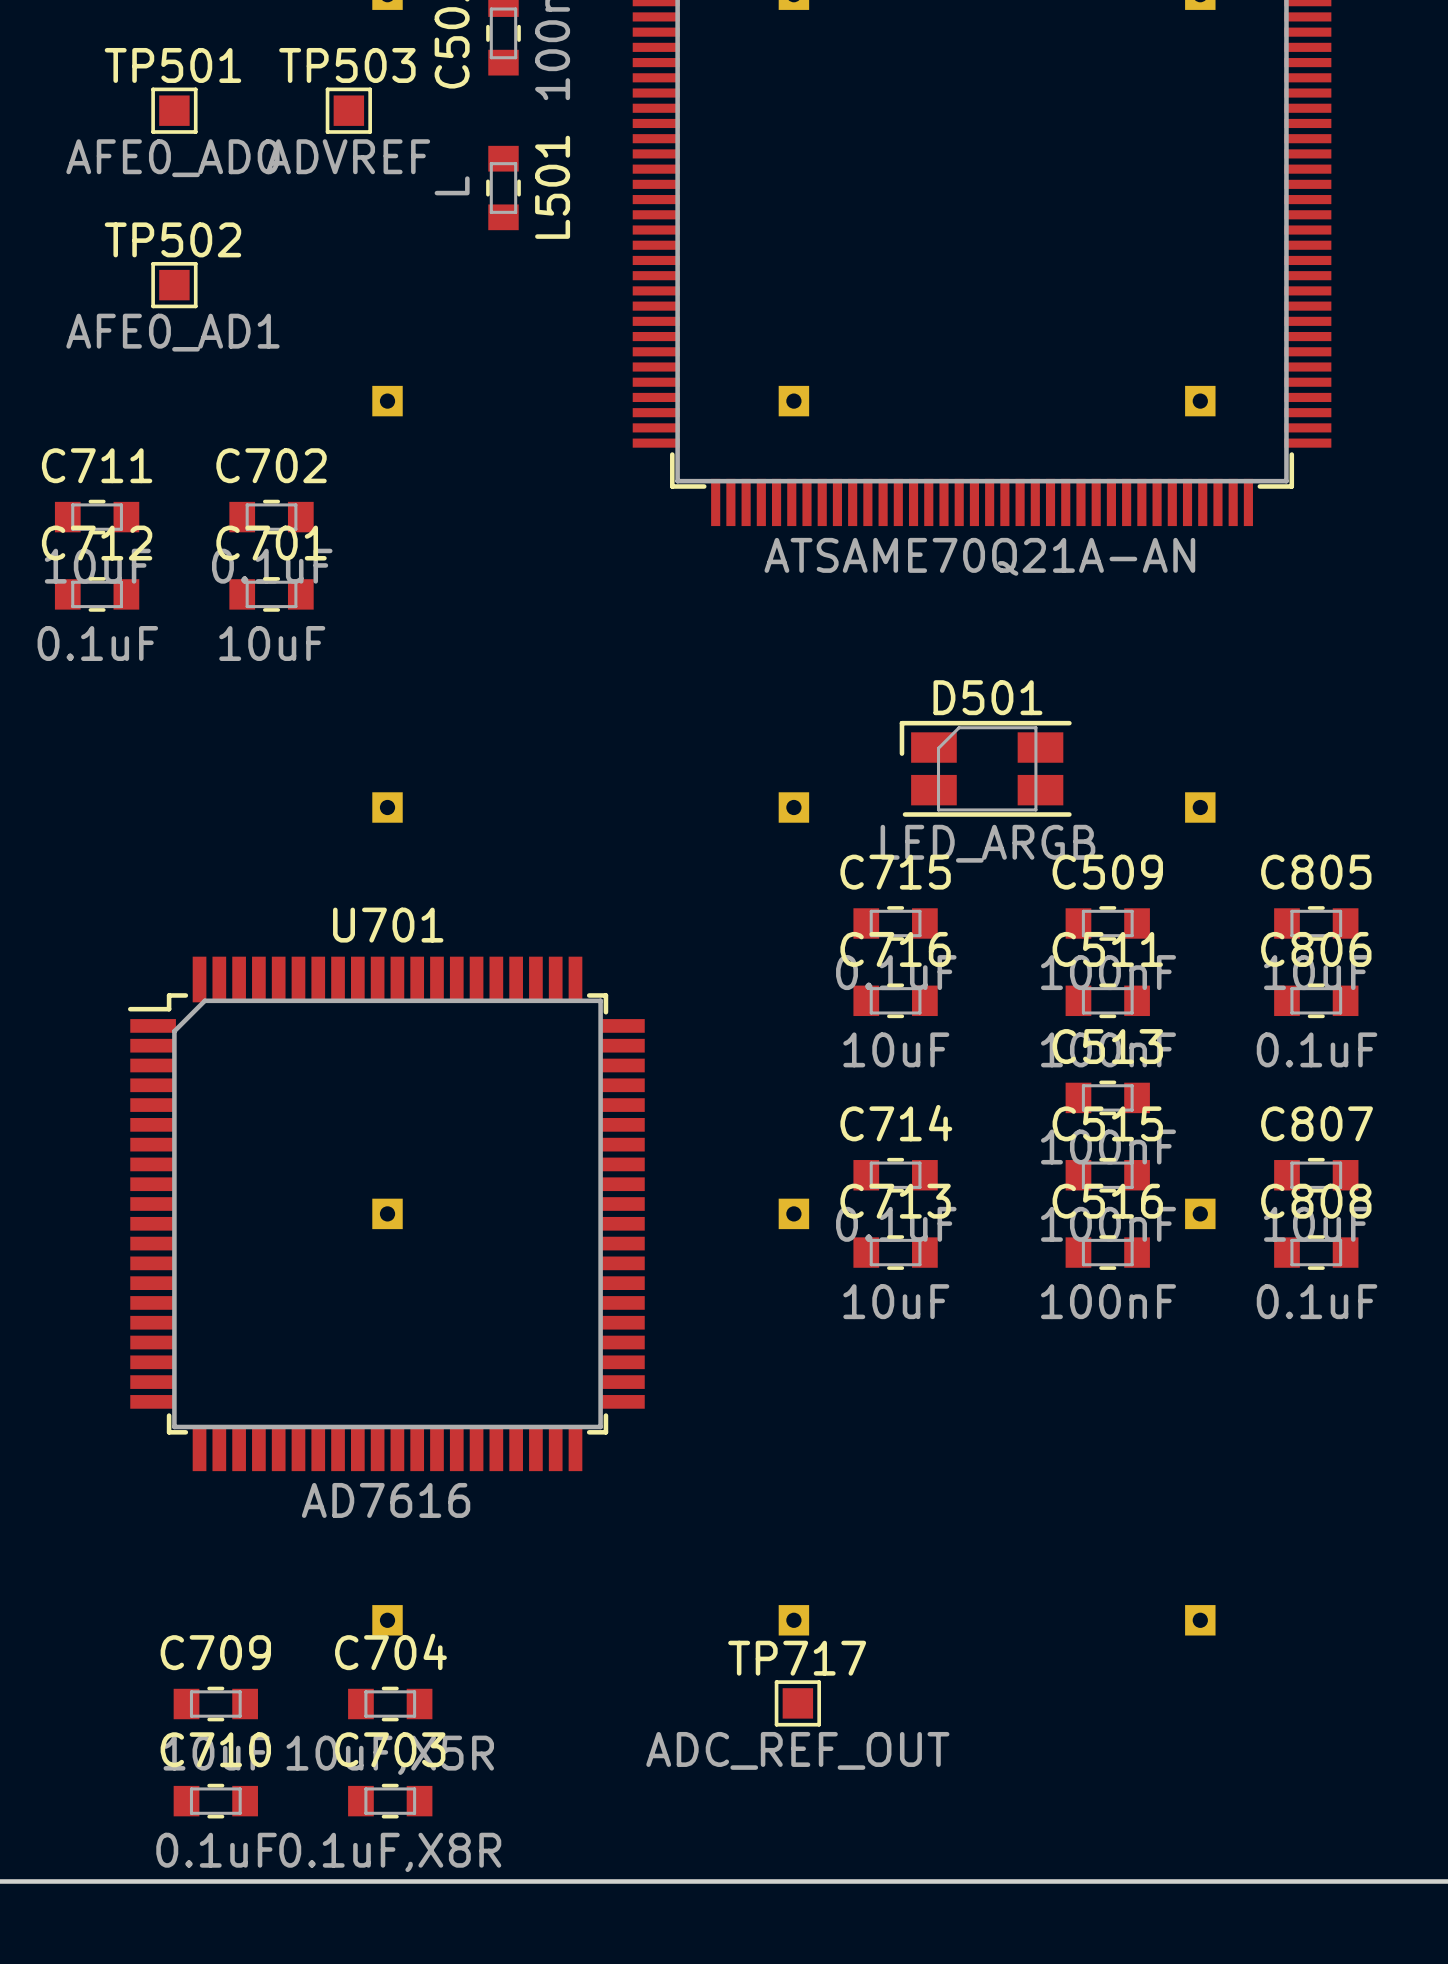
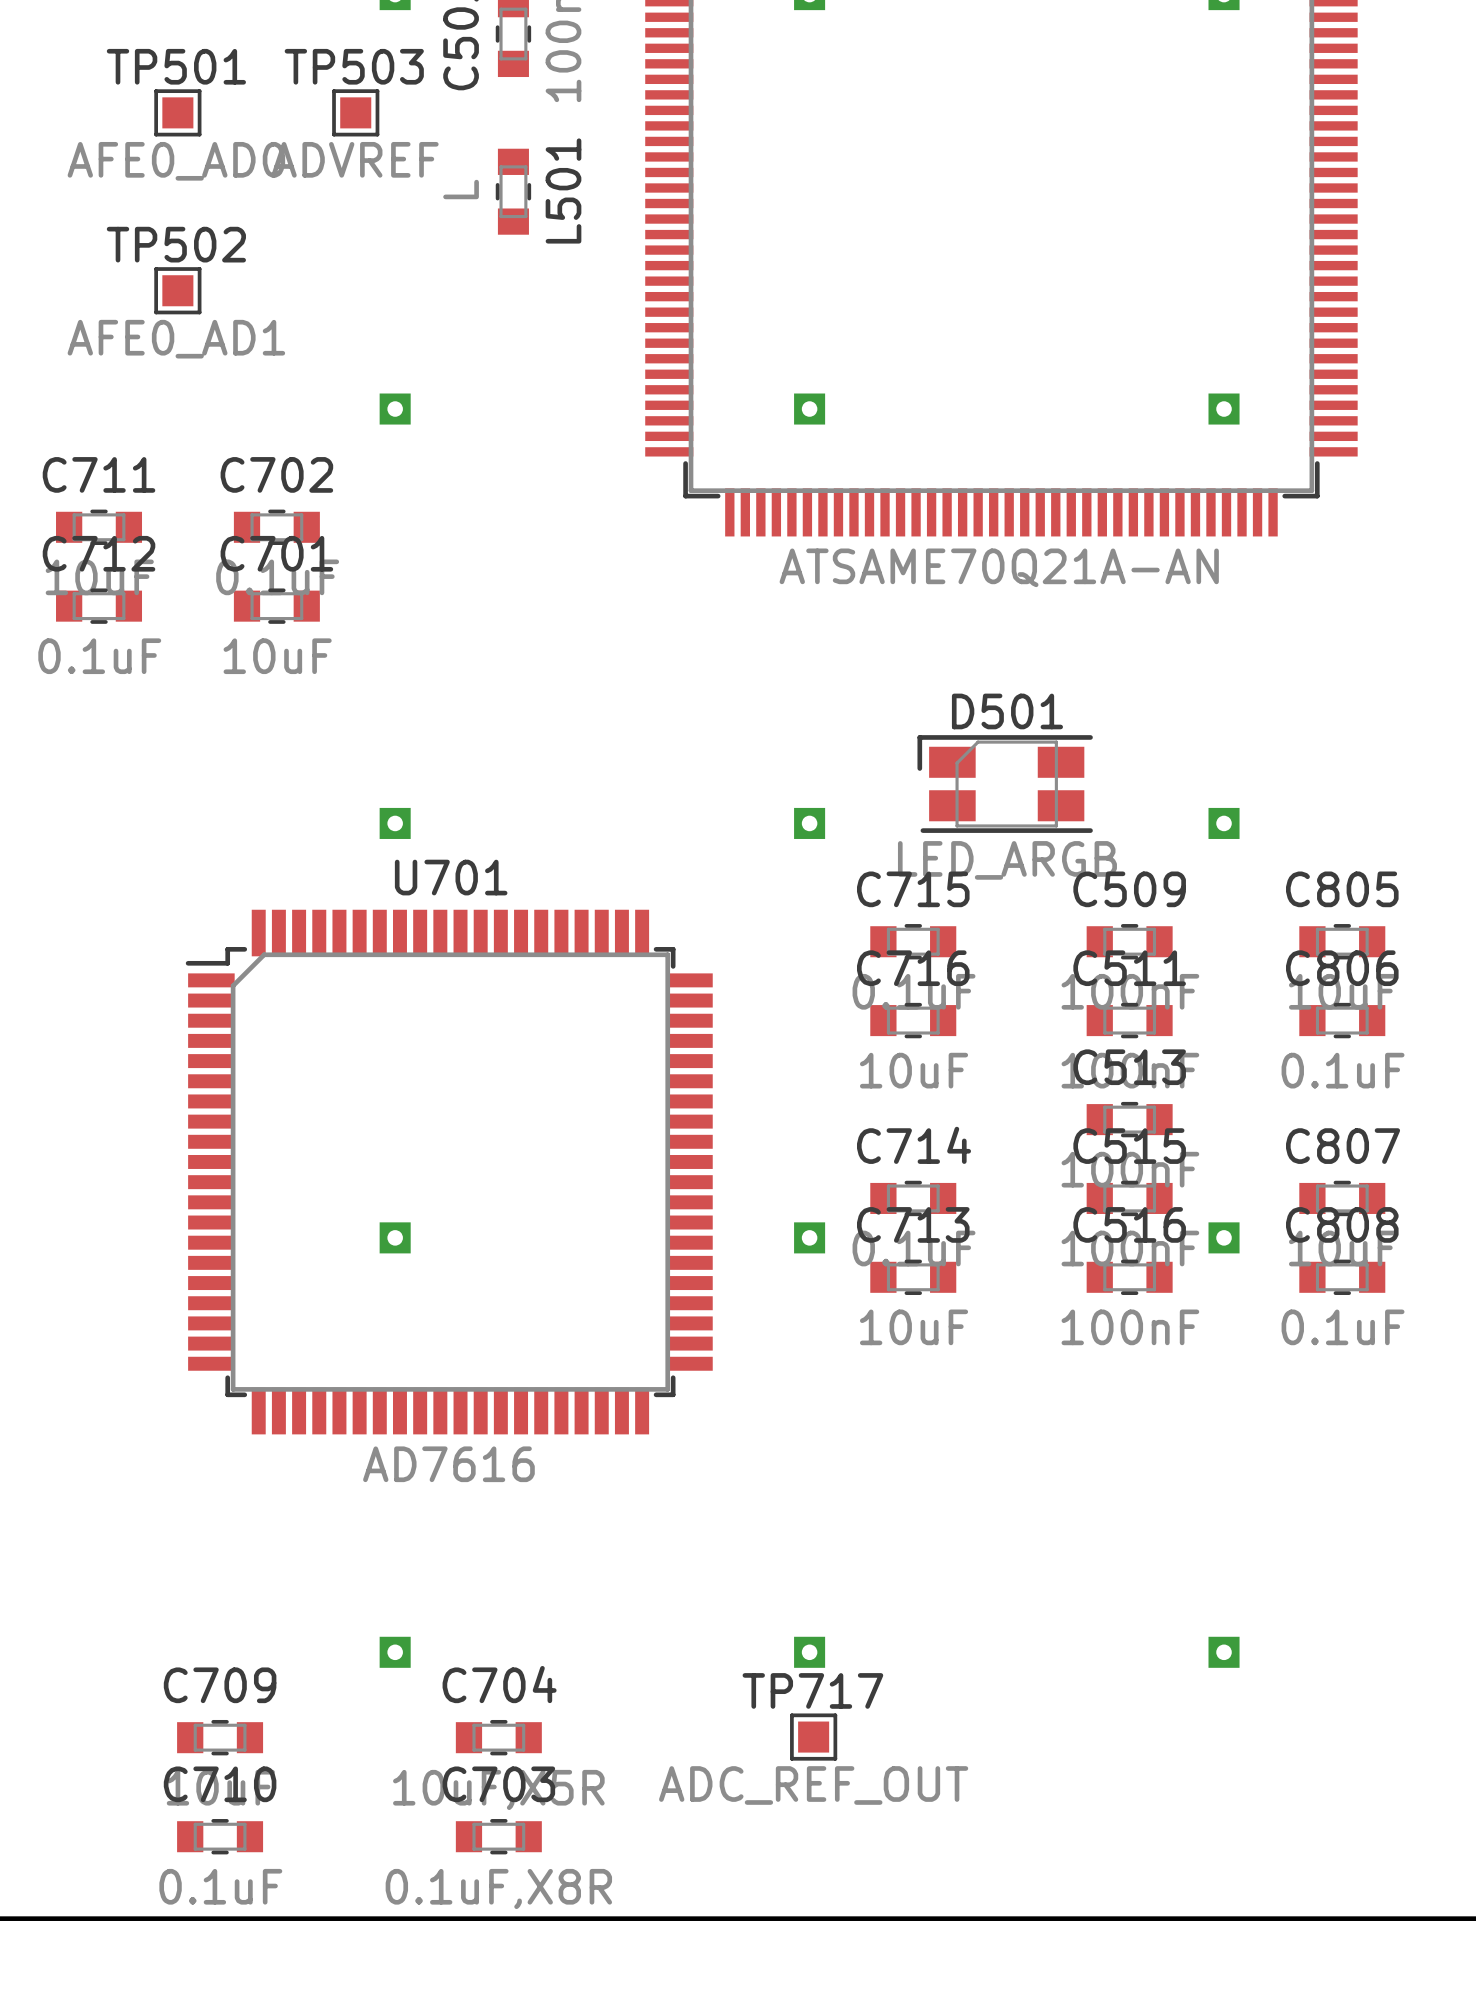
U701 position: (386, 1213) -> (449, 1172)
C704 position: (390, 1704) -> (498, 1737)
C703 position: (390, 1801) -> (498, 1836)

